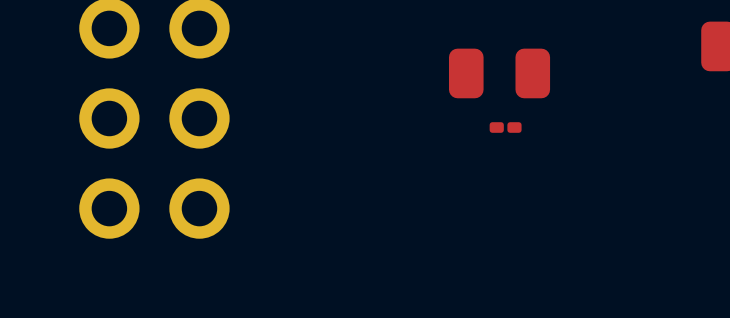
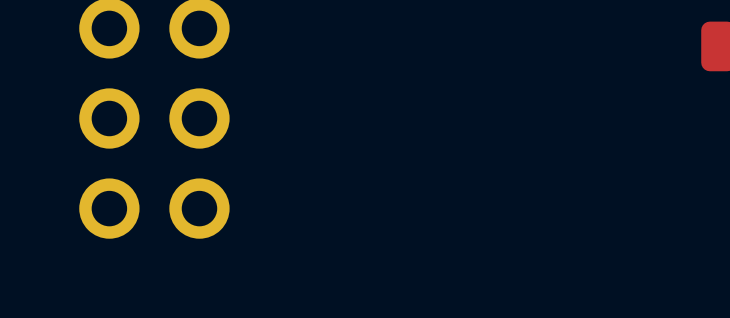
part: (499, 73) -> none
part: (505, 127) -> none

